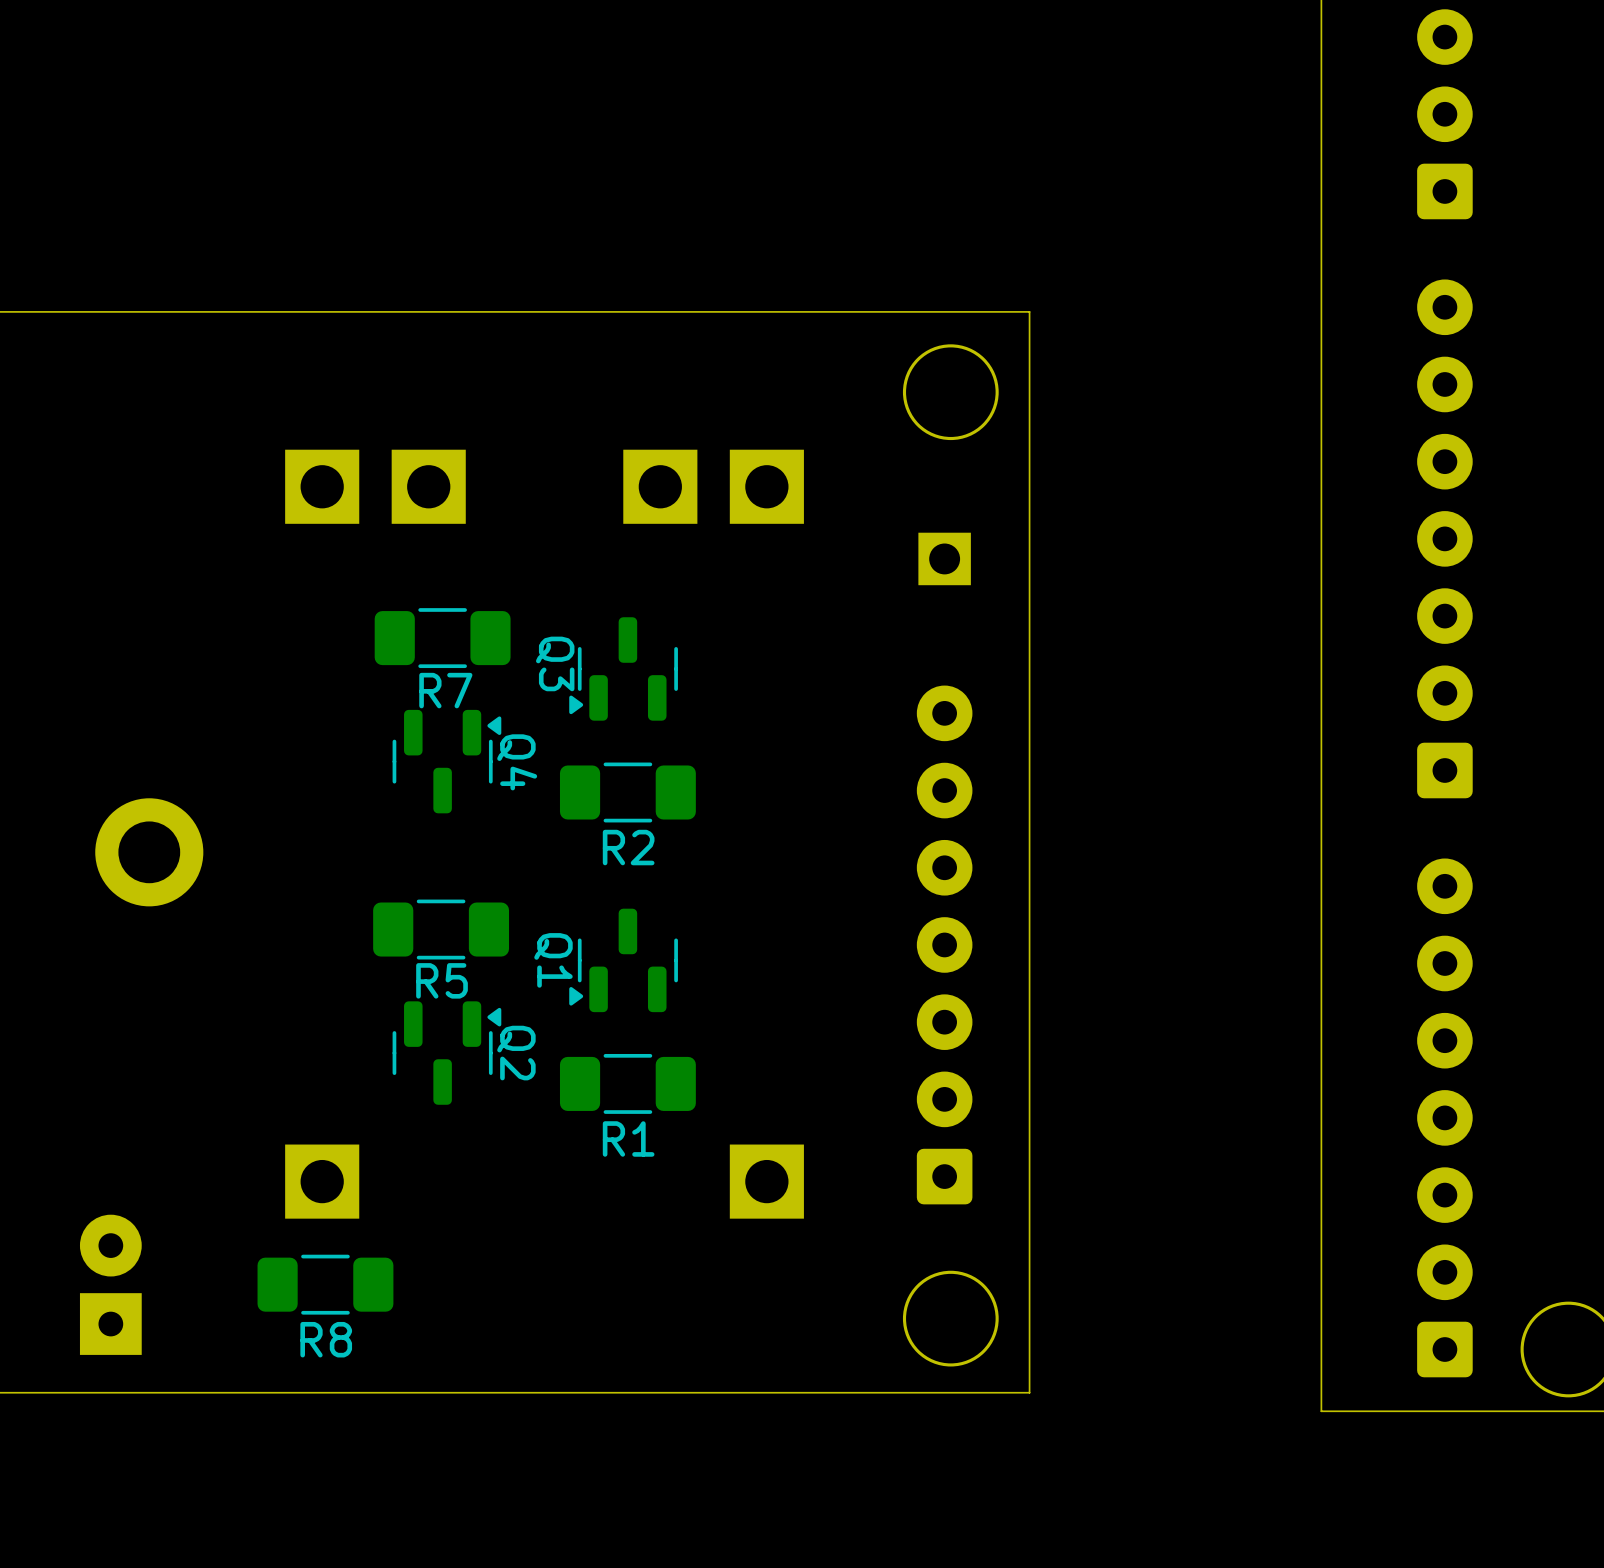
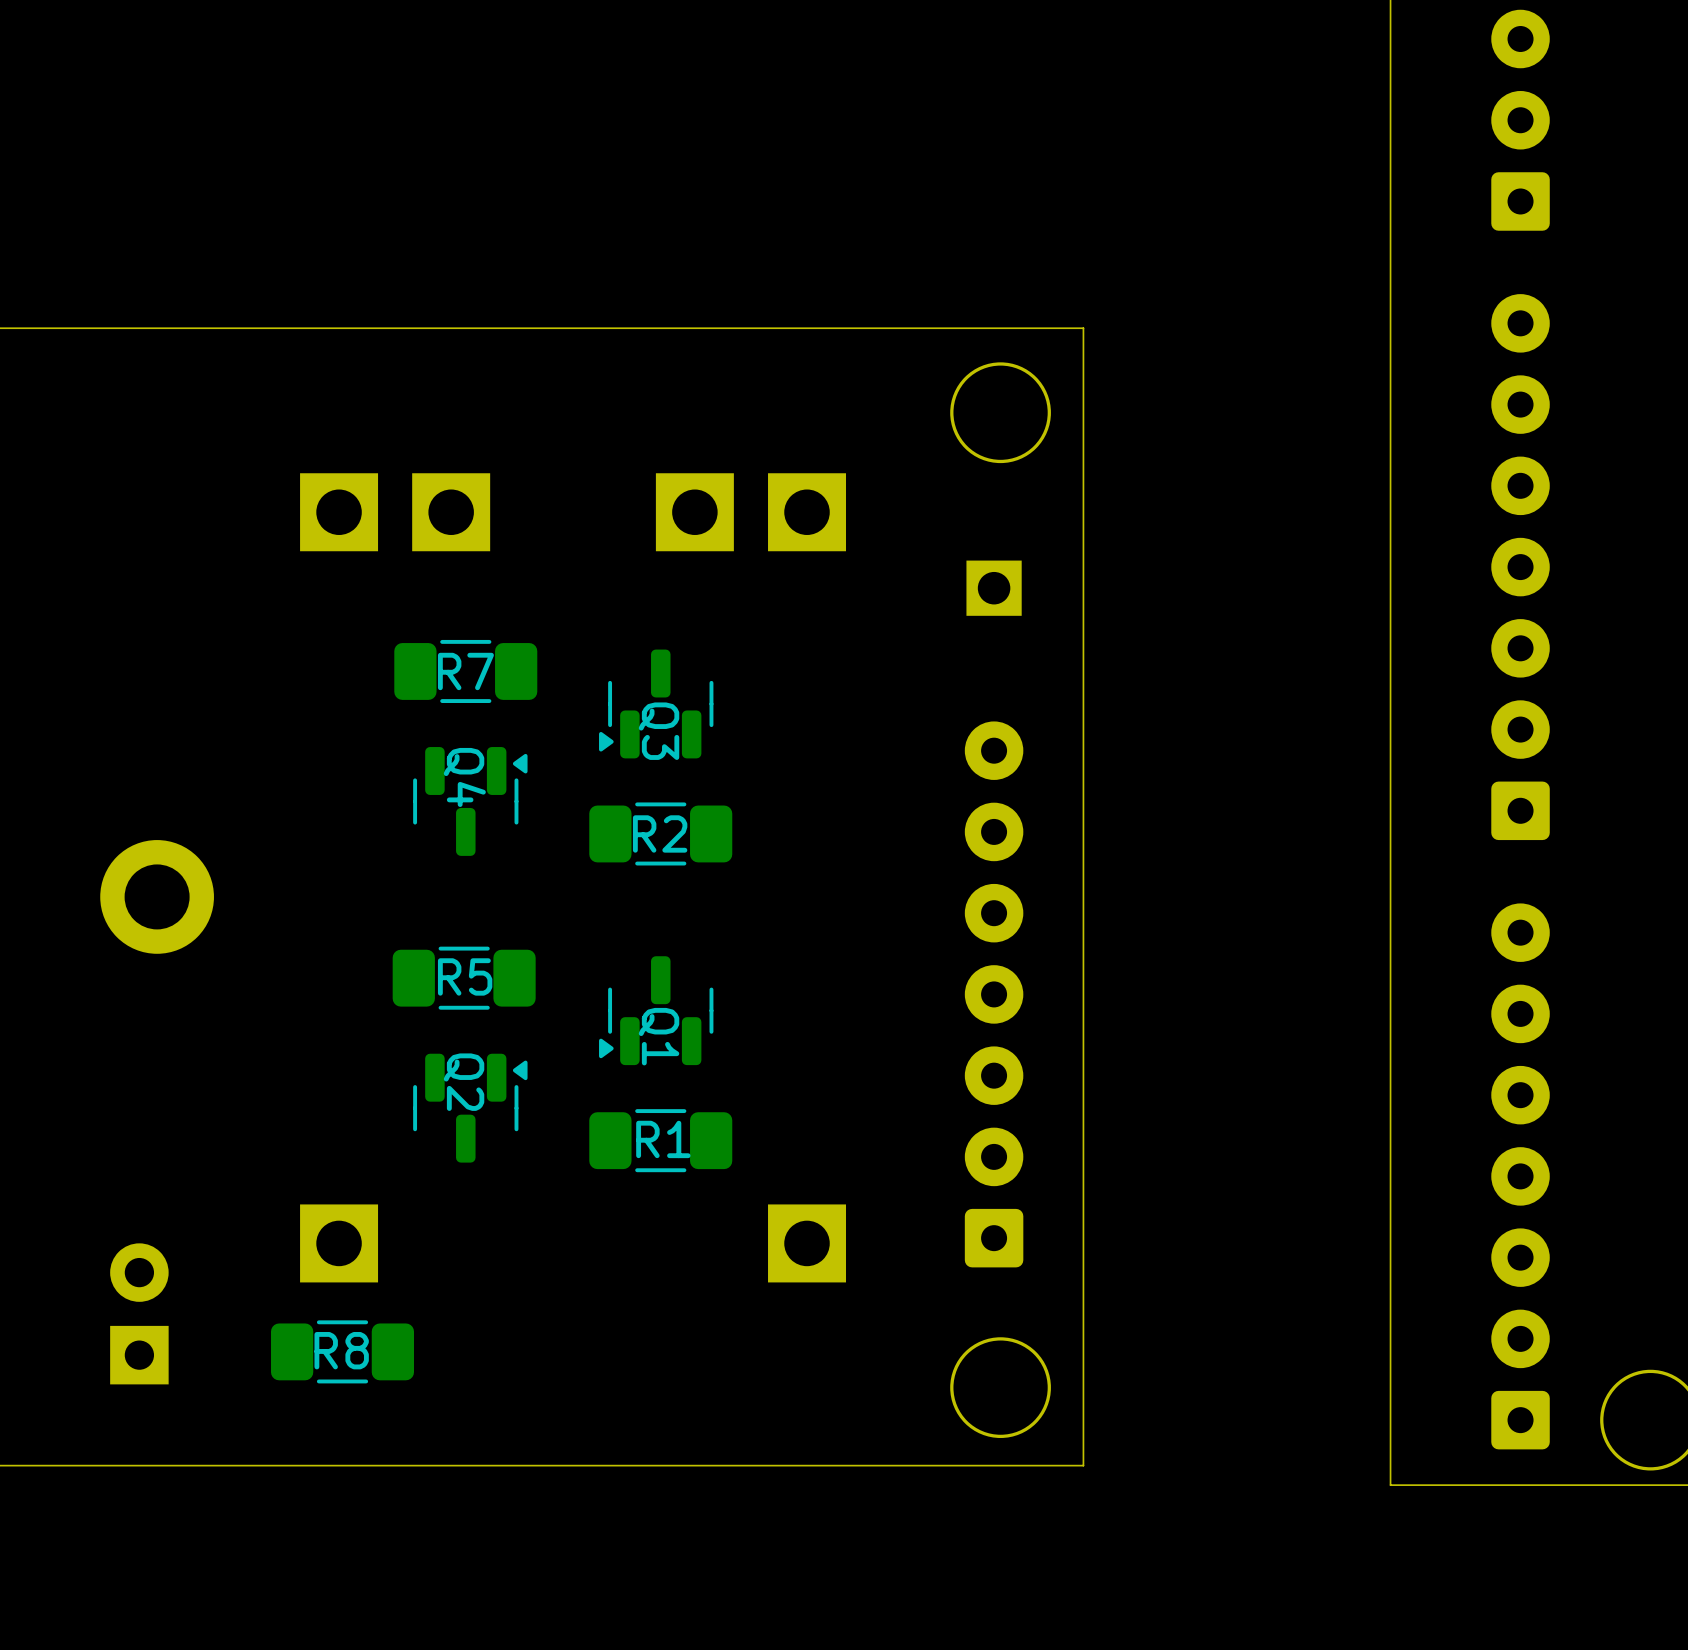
Q3 name position: Q3 (555, 663) -> Q3 (659, 731)
R7 name position: R7 (445, 690) -> R7 (465, 671)
Q4 name position: Q4 (517, 762) -> Q4 (464, 777)
R2 name position: R2 (628, 847) -> R2 (660, 833)
Q1 name position: Q1 (553, 960) -> Q1 (659, 1036)
R5 name position: R5 (442, 980) -> R5 (465, 976)
Q2 name position: Q2 (516, 1053) -> Q2 (464, 1082)
R1 name position: R1 (628, 1138) -> R1 (663, 1139)
part: none -> (139, 1313)
part: (110, 1284) -> none
R8 name position: R8 (326, 1339) -> R8 (341, 1350)

